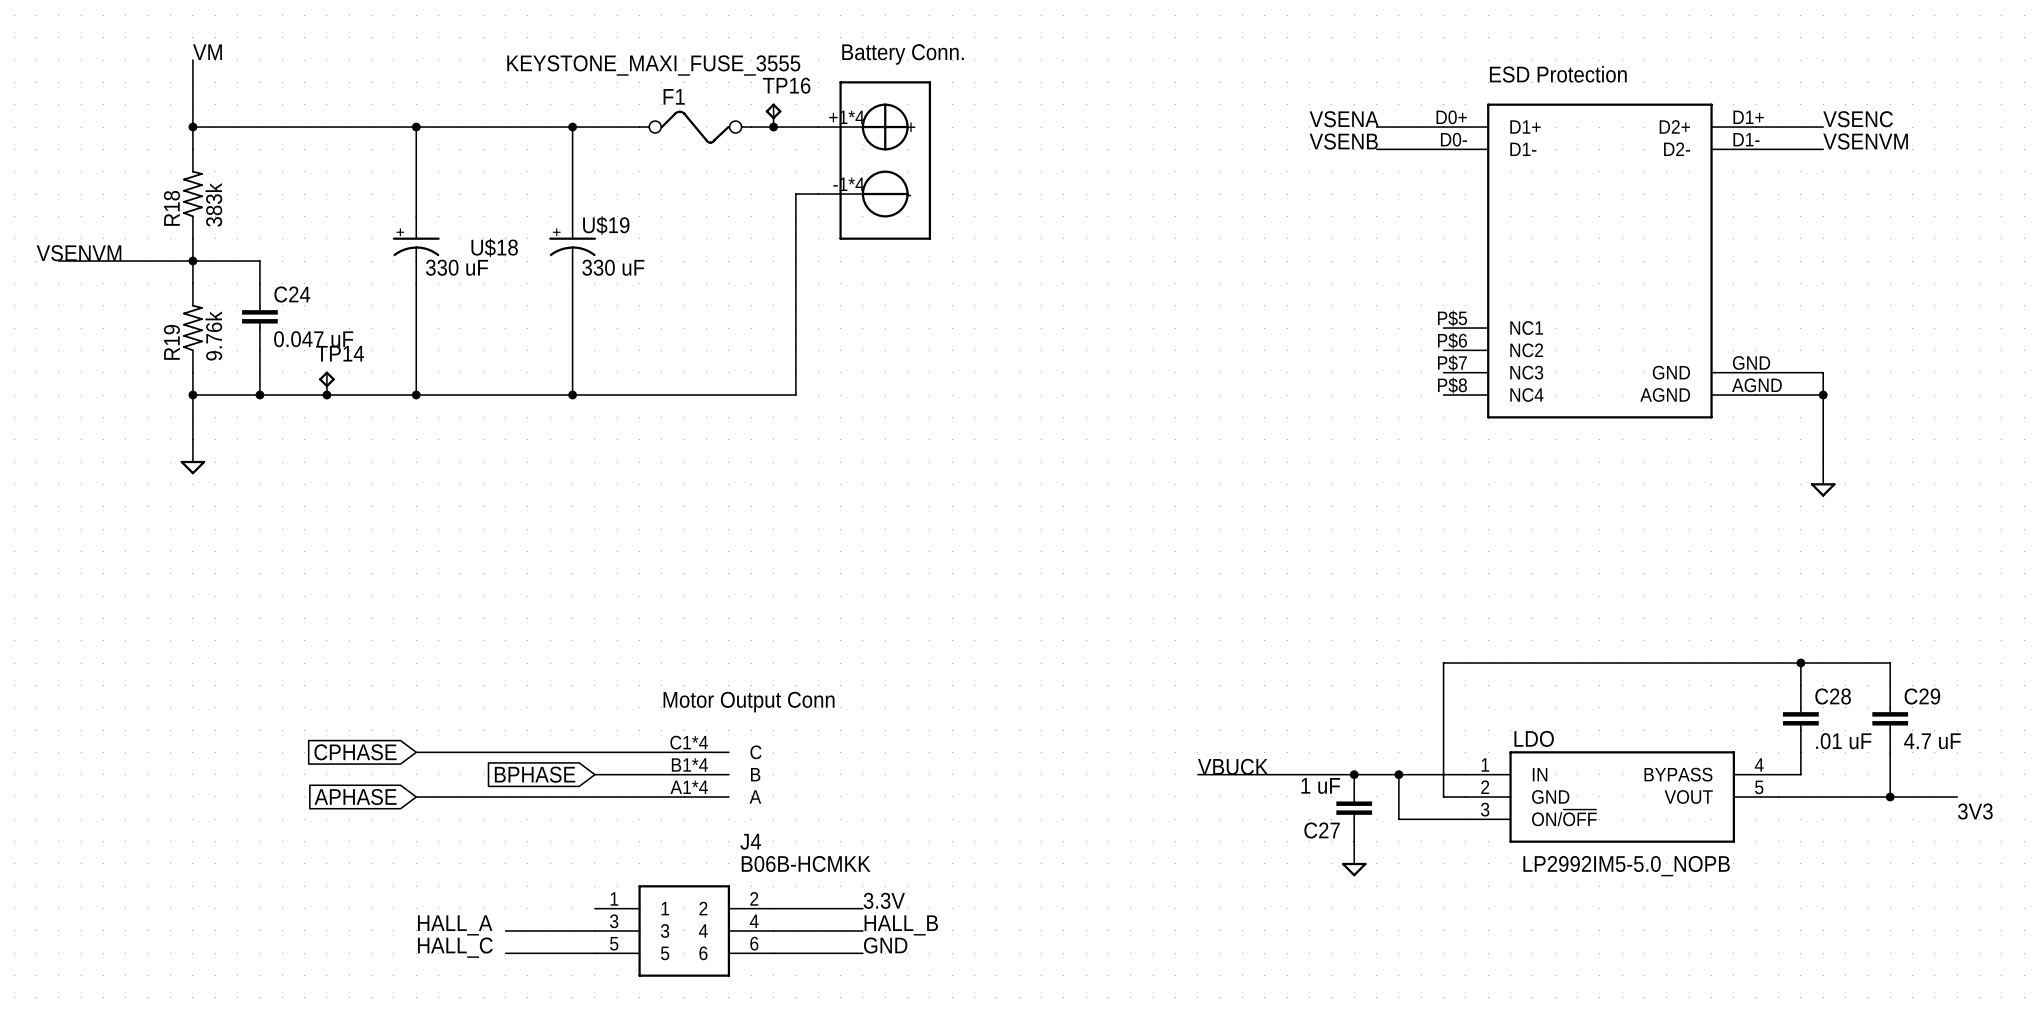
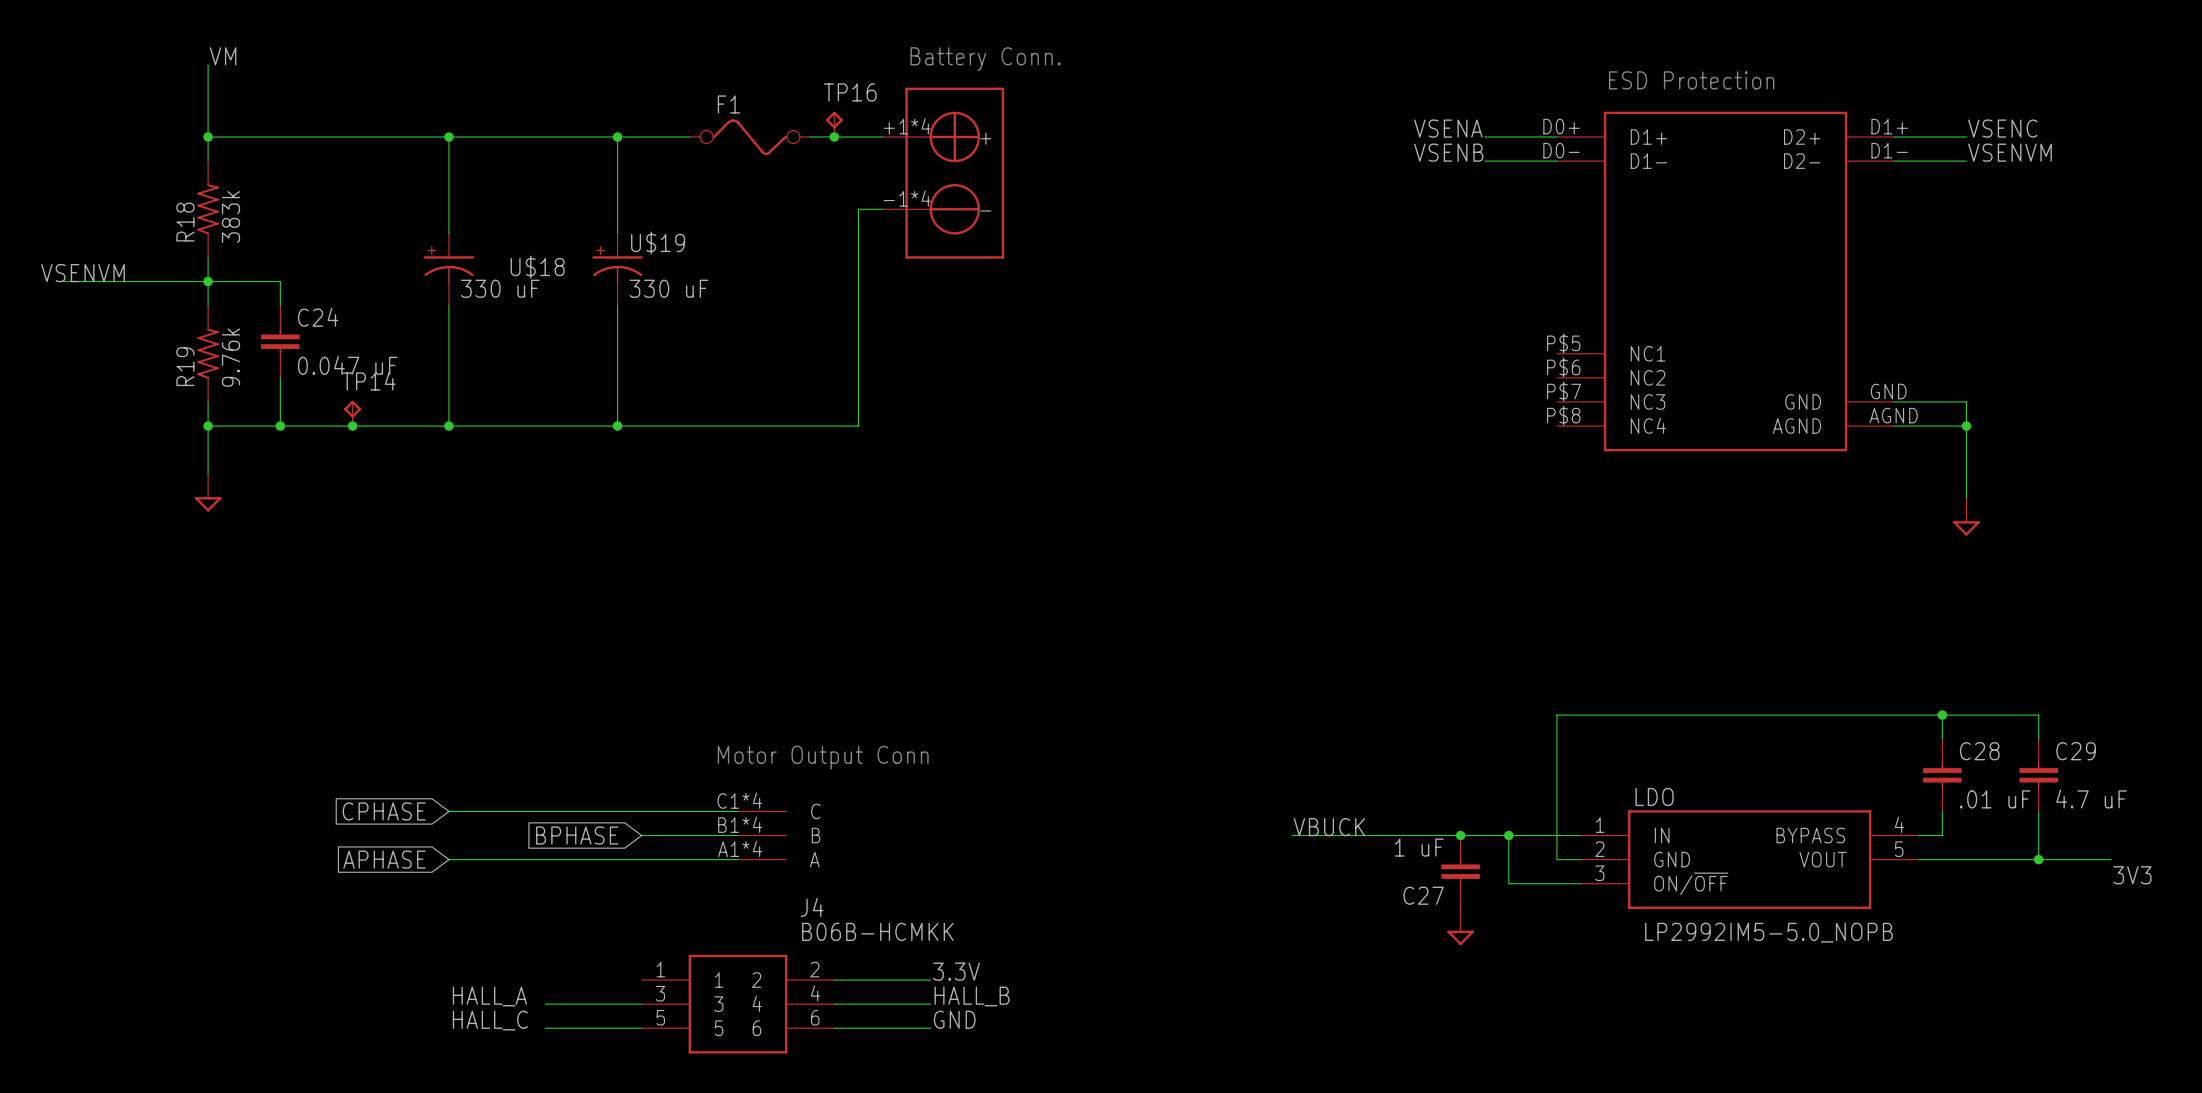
F1 value: KEYSTONE_MAXI_FUSE_3555 (653, 65) -> none

